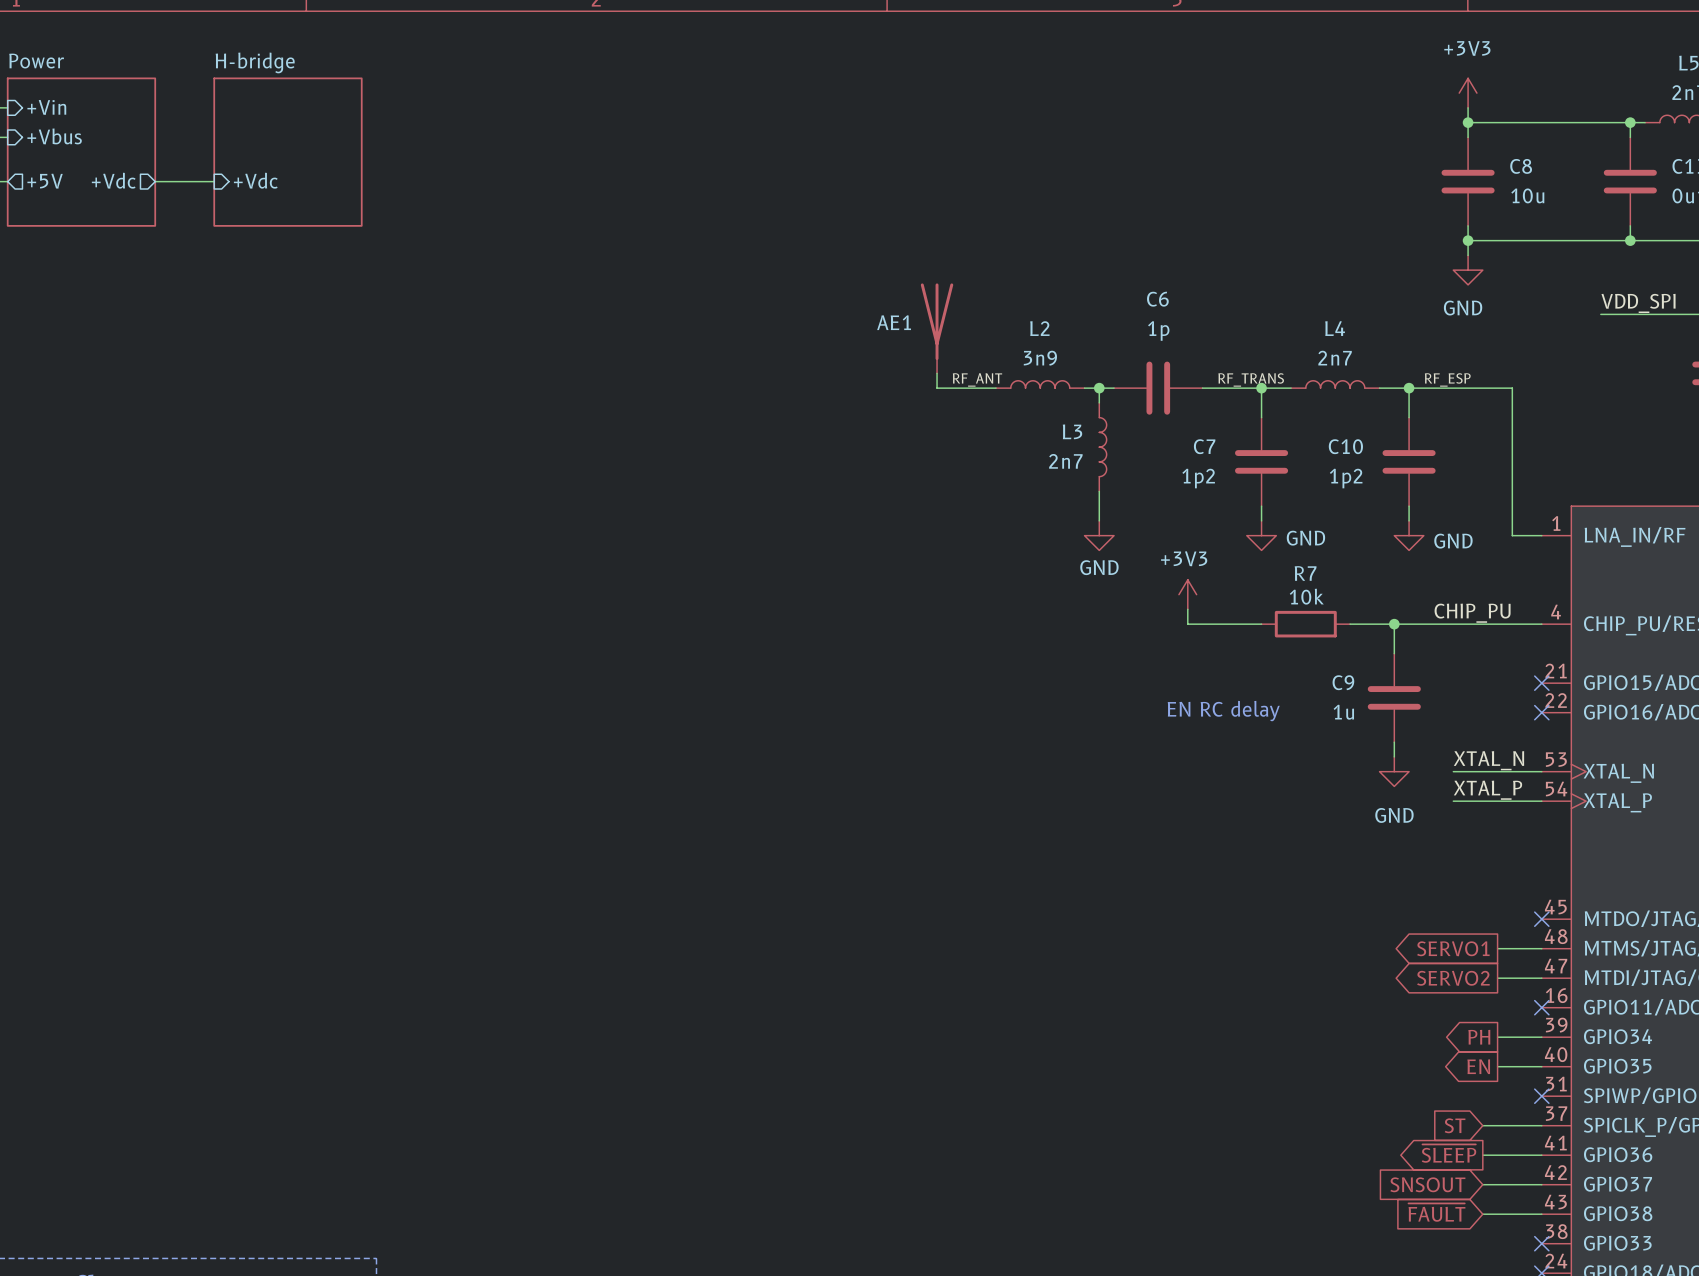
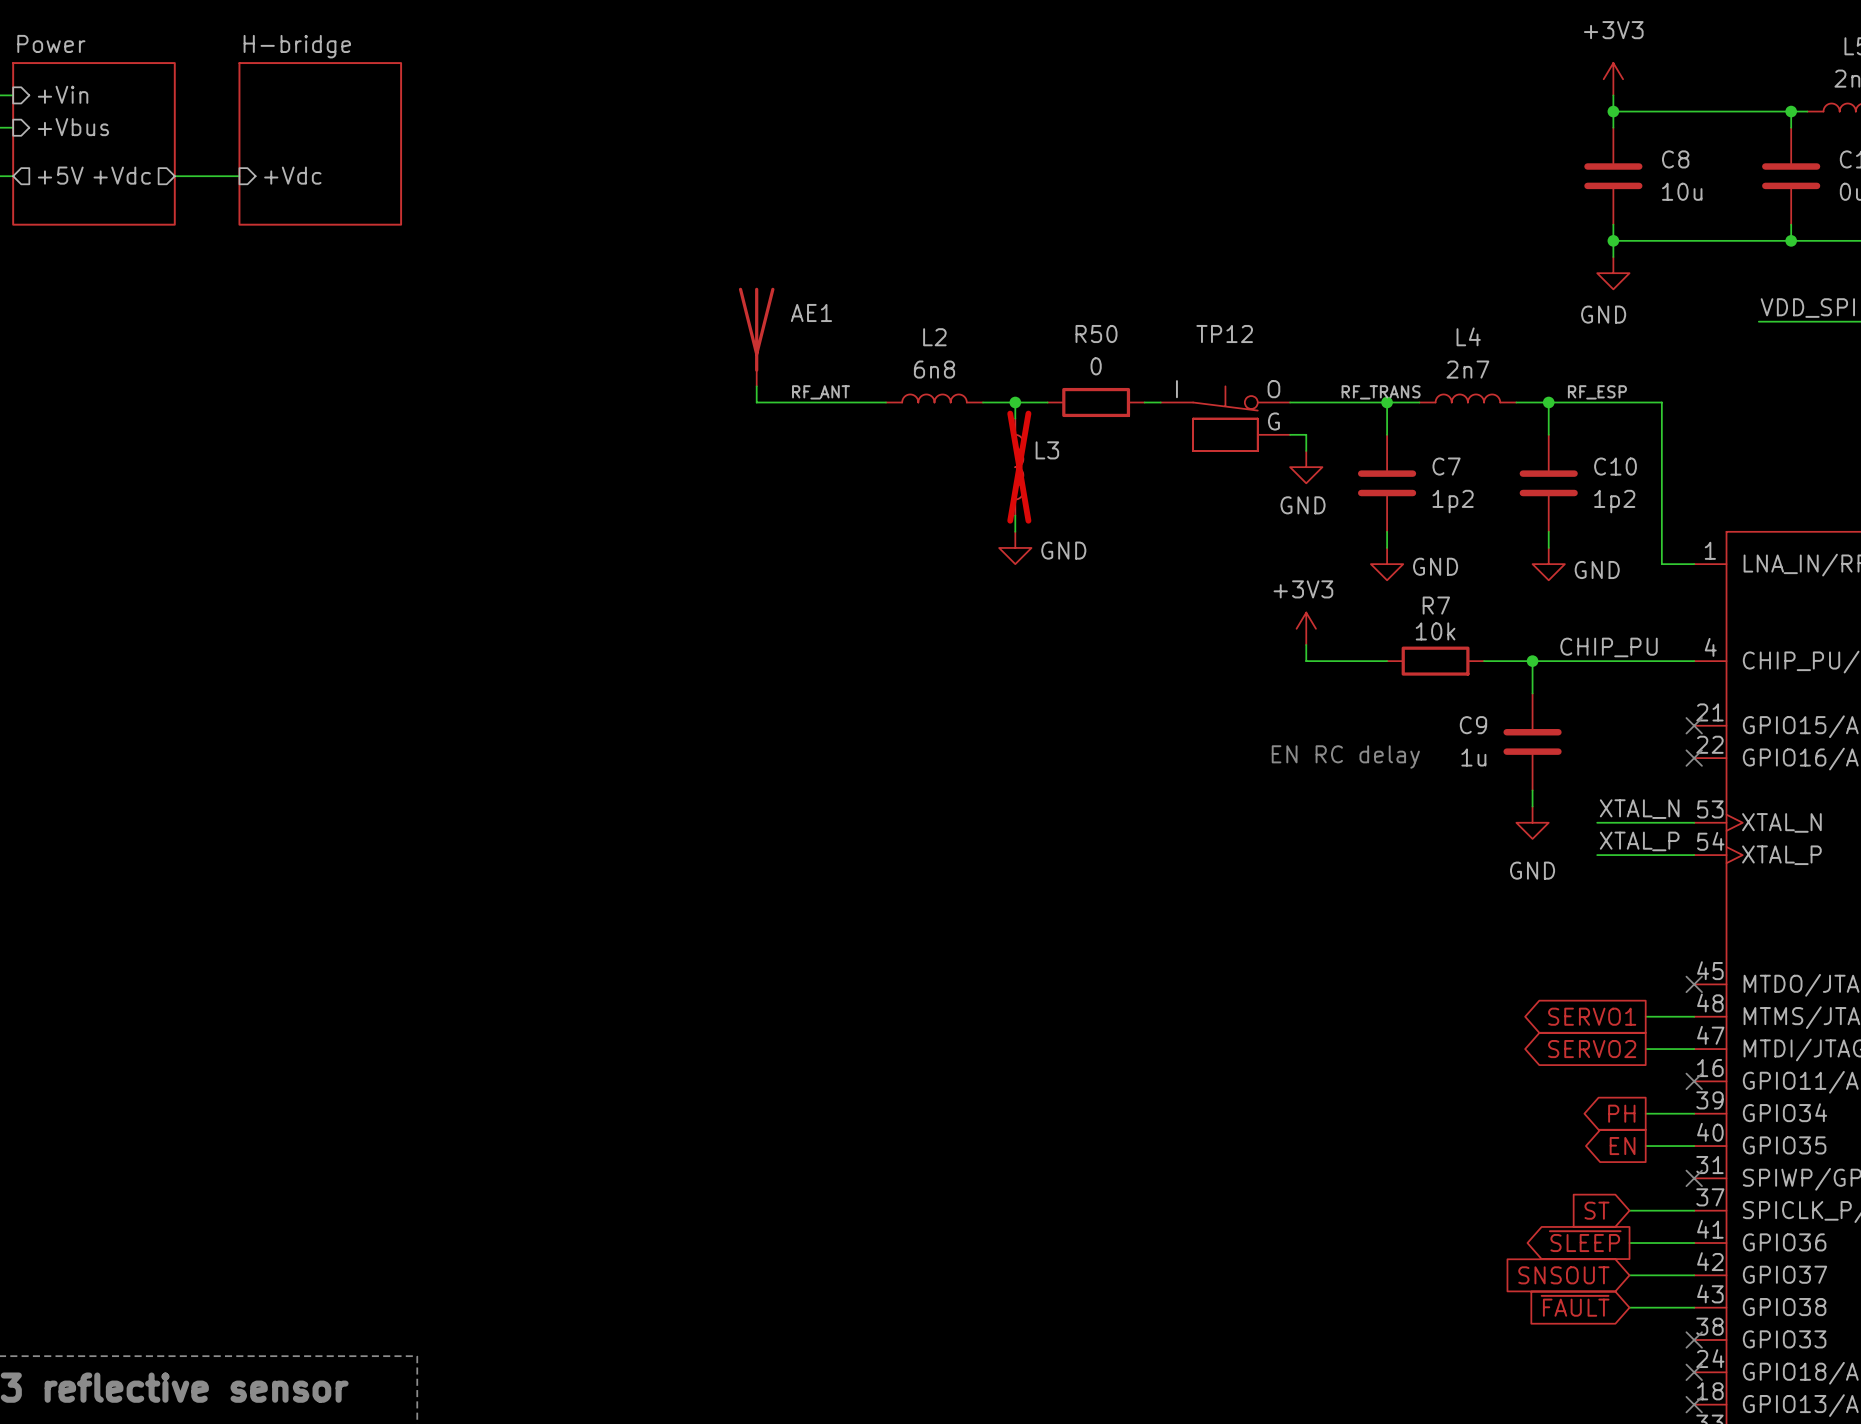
AE1 name position: AE1 (894, 322) -> AE1 (811, 312)
AE1 position: (937, 328) -> (756, 337)
L2 value: 3n9 (1040, 358) -> 6n8 (934, 369)
wire: none -> (756, 386) (756, 402) (886, 402)
wire: (937, 373) (937, 388) -> (982, 402) (1031, 402)
label position: RF_ANT (977, 379) -> RF_ANT (821, 392)
L2 position: (1040, 384) -> (934, 398)
junction: none -> (1015, 402)
wire: (951, 388) (996, 388) -> none
R50: none -> 0 (1096, 402)
wire: none -> (1144, 402) (1160, 402)
wire: (1099, 388) (1099, 402) -> (1015, 402) (1015, 418)
junction: (1099, 388) -> none
C6: 1p (1158, 388) -> none
TP12: none -> (1225, 418)
wire: none -> (1290, 434) (1306, 434) (1306, 450)
L3 name position: L3 (1072, 431) -> L3 (1047, 450)
C7 name position: C7 (1204, 446) -> C7 (1446, 466)
C10 name position: C10 (1345, 446) -> C10 (1615, 466)
L3 do-not-place cross: none -> (1019, 467)
L3 position: (1102, 447) -> (1019, 467)
power symbol: none -> GND (1306, 467)
L3 value: 2n7 (1065, 461) -> none
C7 value position: 1p2 (1198, 478) -> 1p2 (1453, 501)
C10 value position: 1p2 (1346, 478) -> 1p2 (1614, 501)
wire: none -> (1015, 515) (1015, 531)
wire: (1099, 491) (1099, 520) -> none
power symbol: none -> GND (1015, 547)
power symbol: GND (1099, 535) -> none

